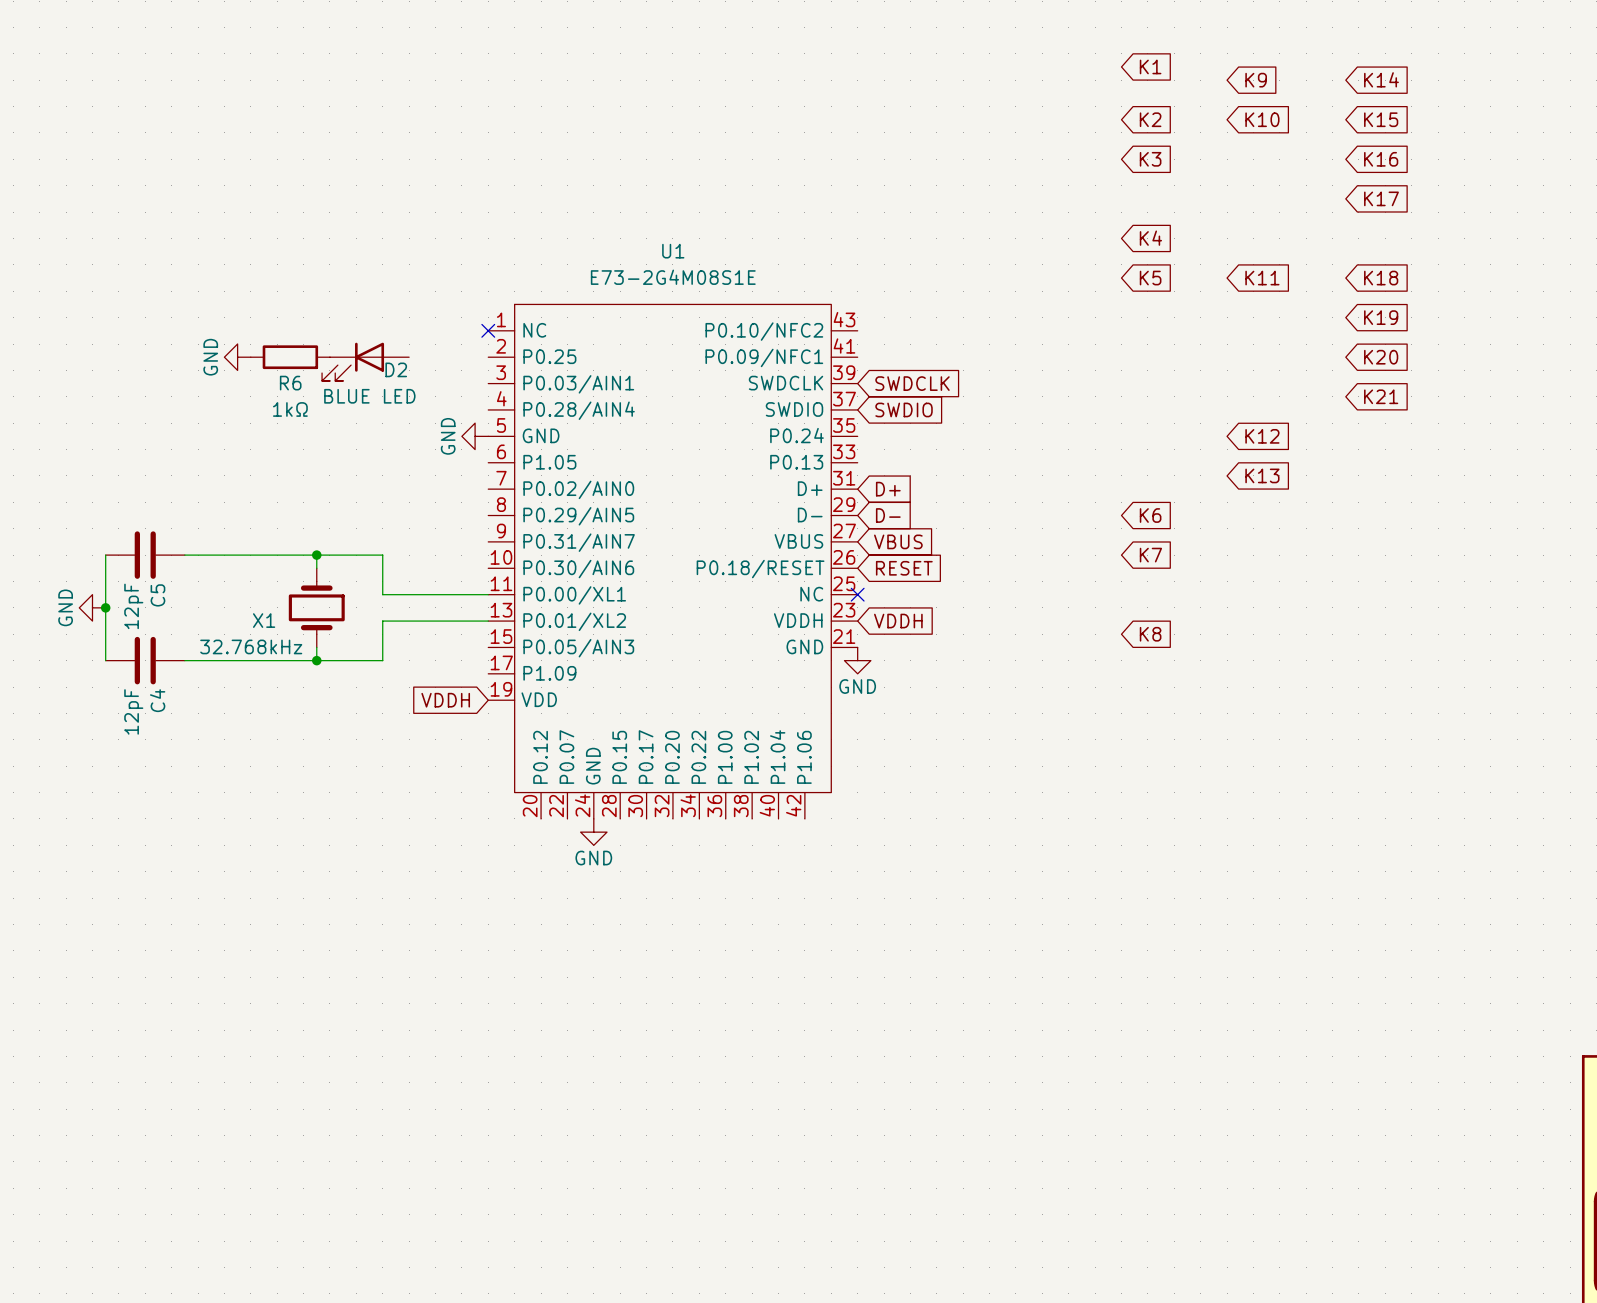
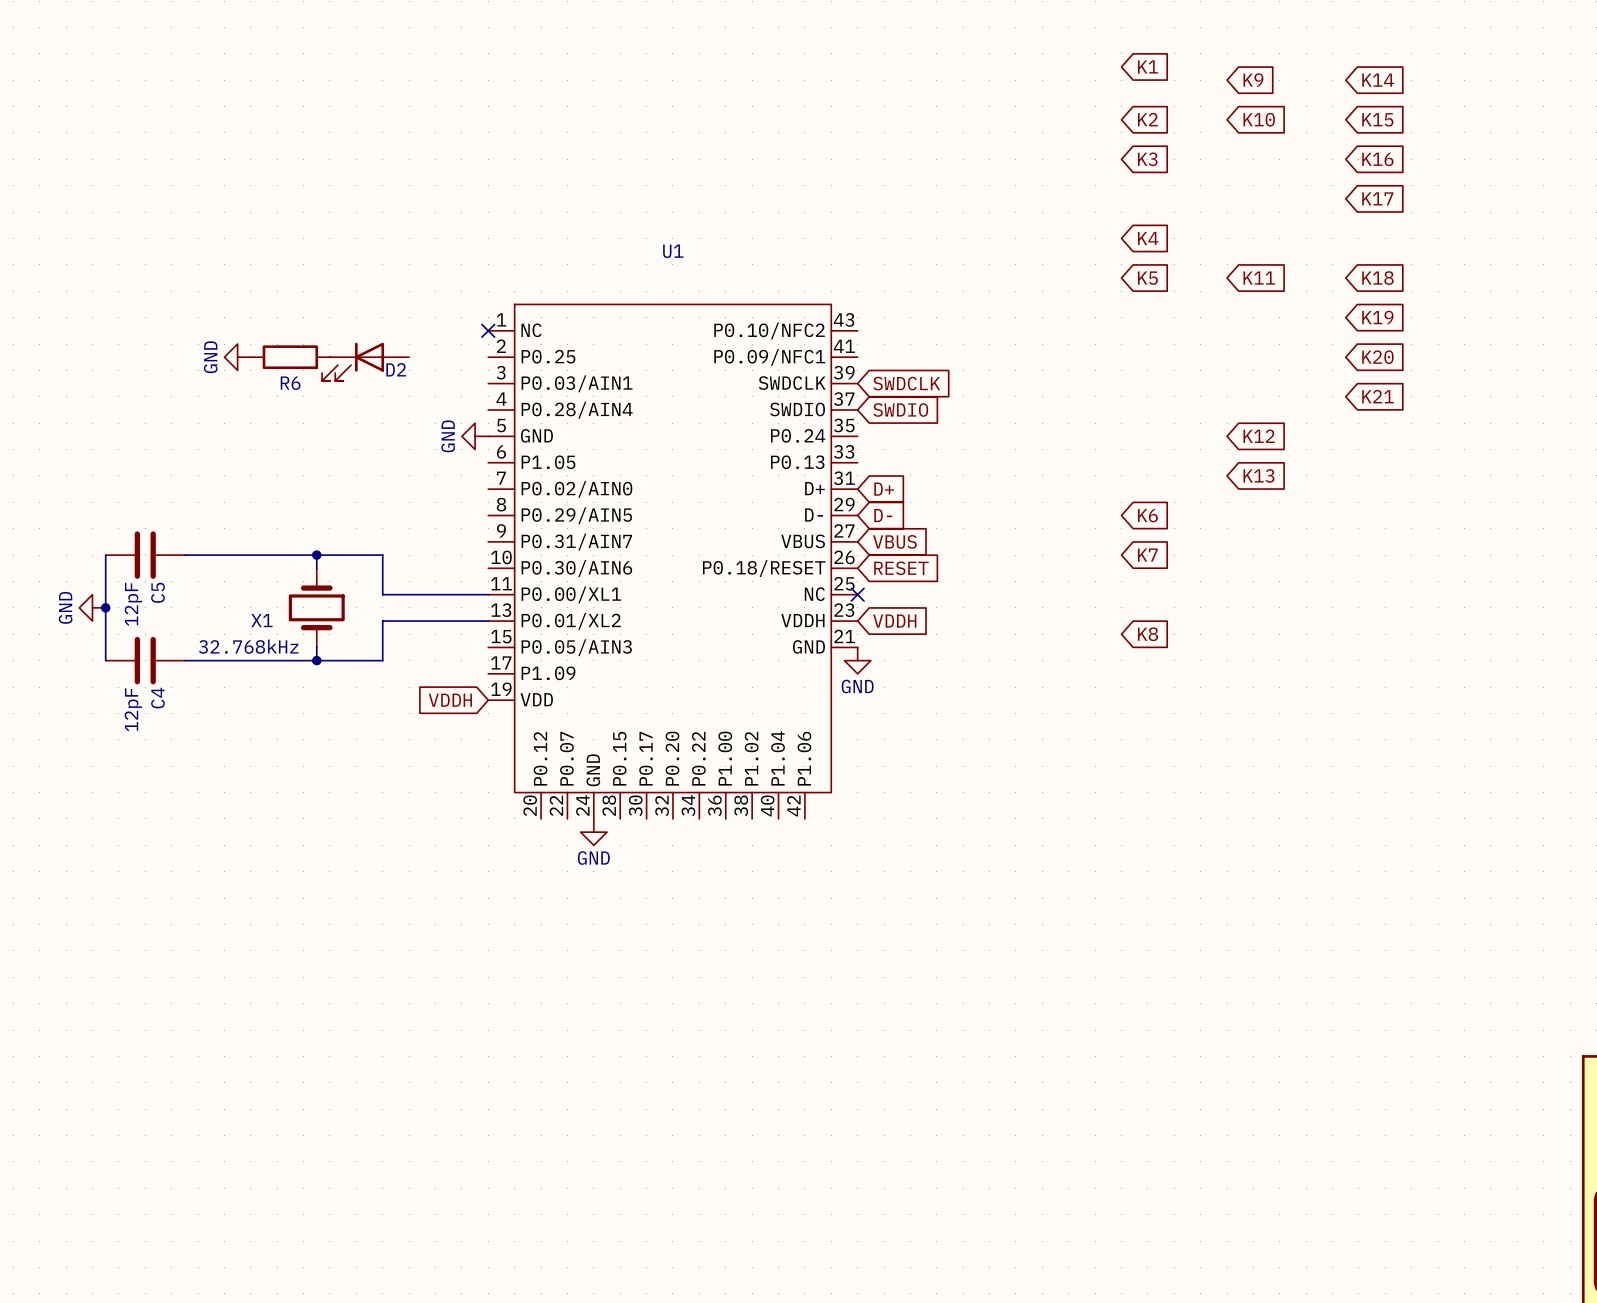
U1 value: E73-2G4M08S1E (673, 277) -> none
D2 value: BLUE LED (369, 396) -> none
R6 value: 1kΩ (290, 409) -> none

